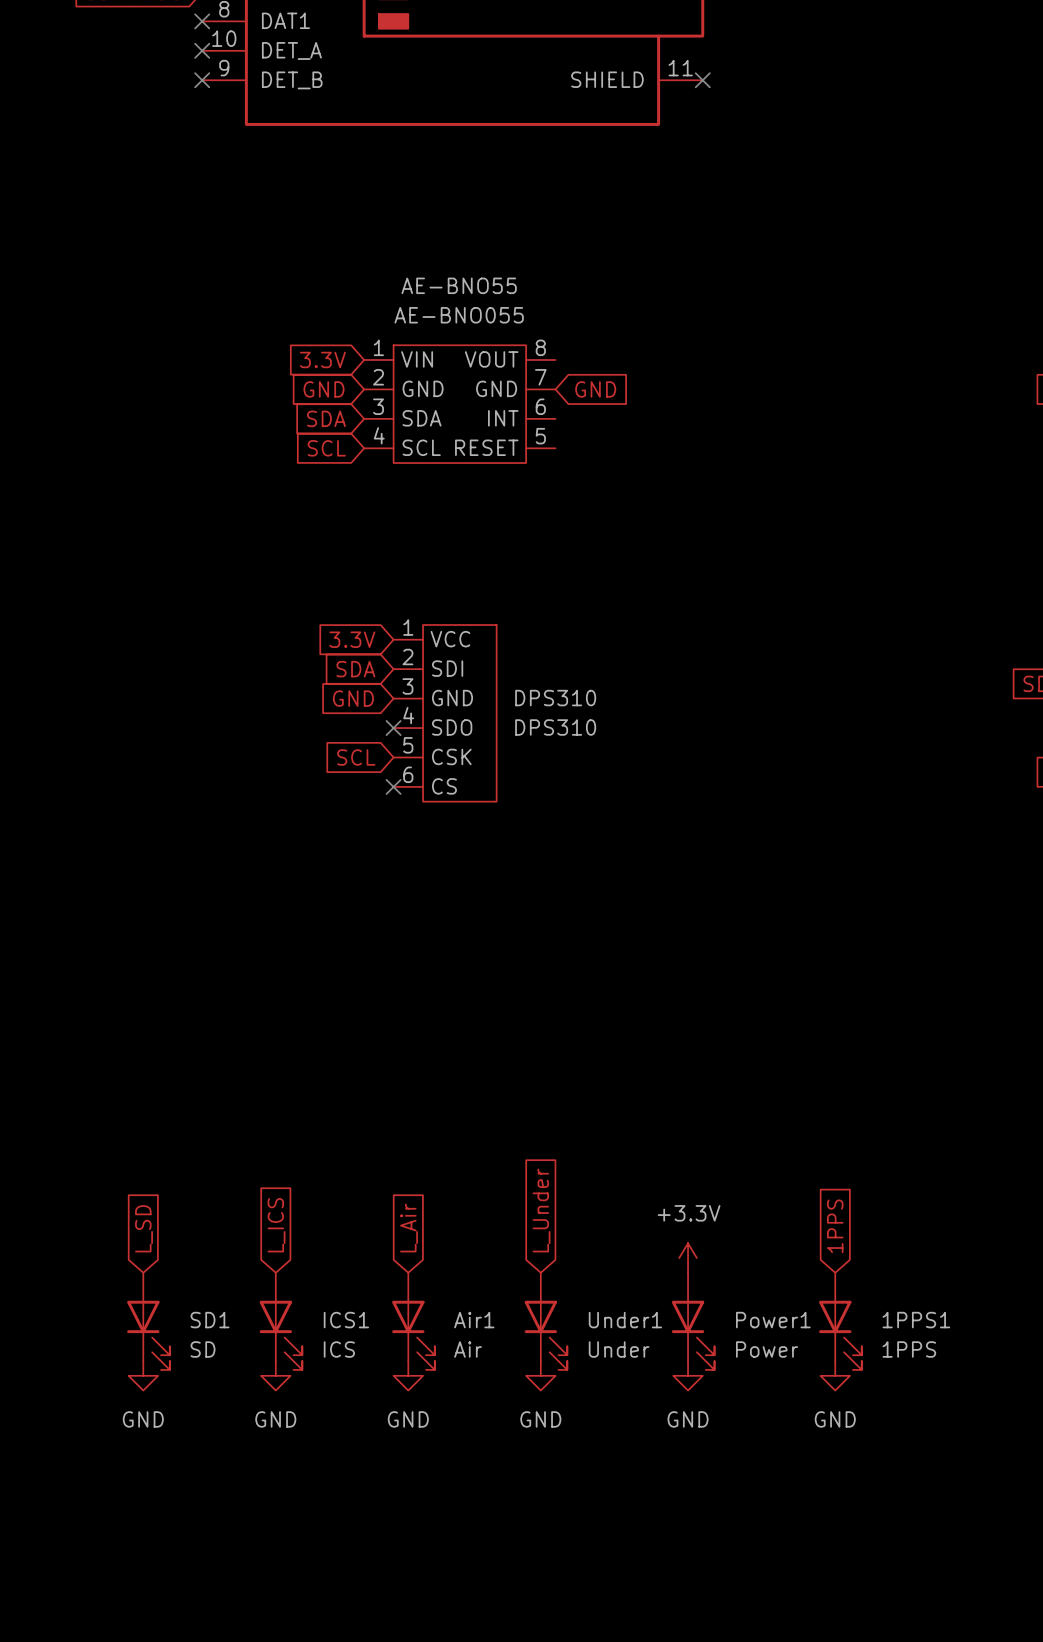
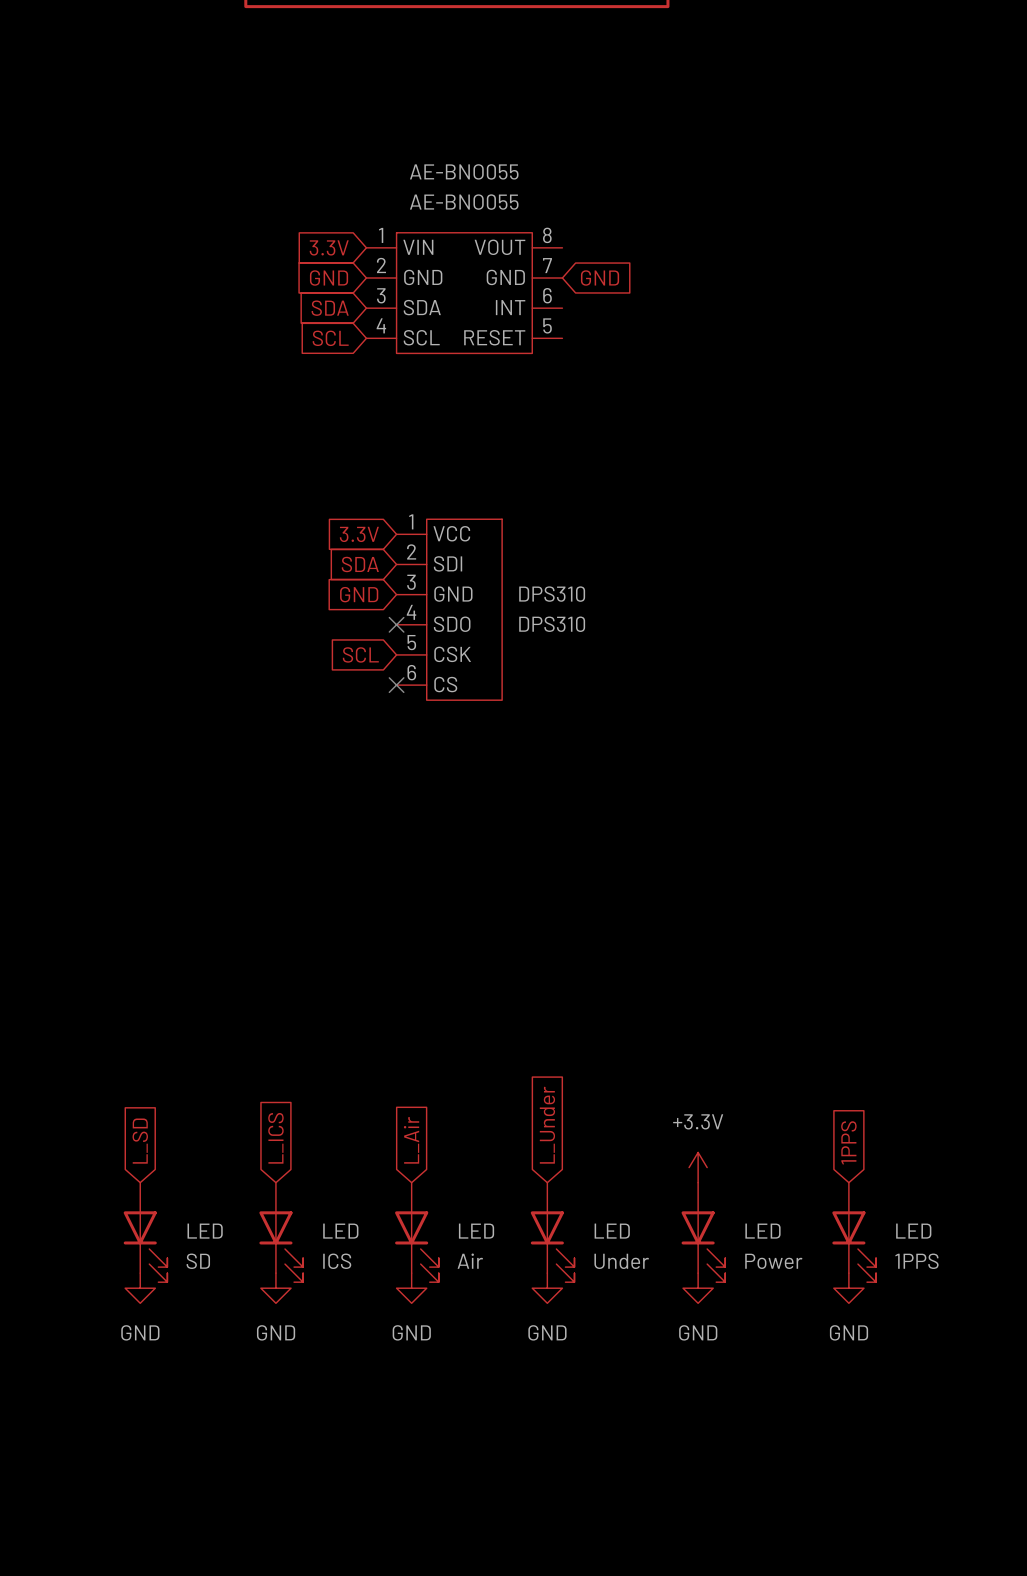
AE-BNO55 name: AE-BNO55 (459, 285) -> AE-BNO055 (464, 171)
SD1 name: SD1 (210, 1320) -> LED (205, 1231)
ICS1 name: ICS1 (346, 1320) -> LED (340, 1231)
Air1 name: Air1 (474, 1320) -> LED (476, 1231)
Under1 name: Under1 (625, 1320) -> LED (612, 1231)
Power1 name: Power1 (773, 1320) -> LED (762, 1231)
1PPS1 name: 1PPS1 (916, 1320) -> LED (913, 1231)

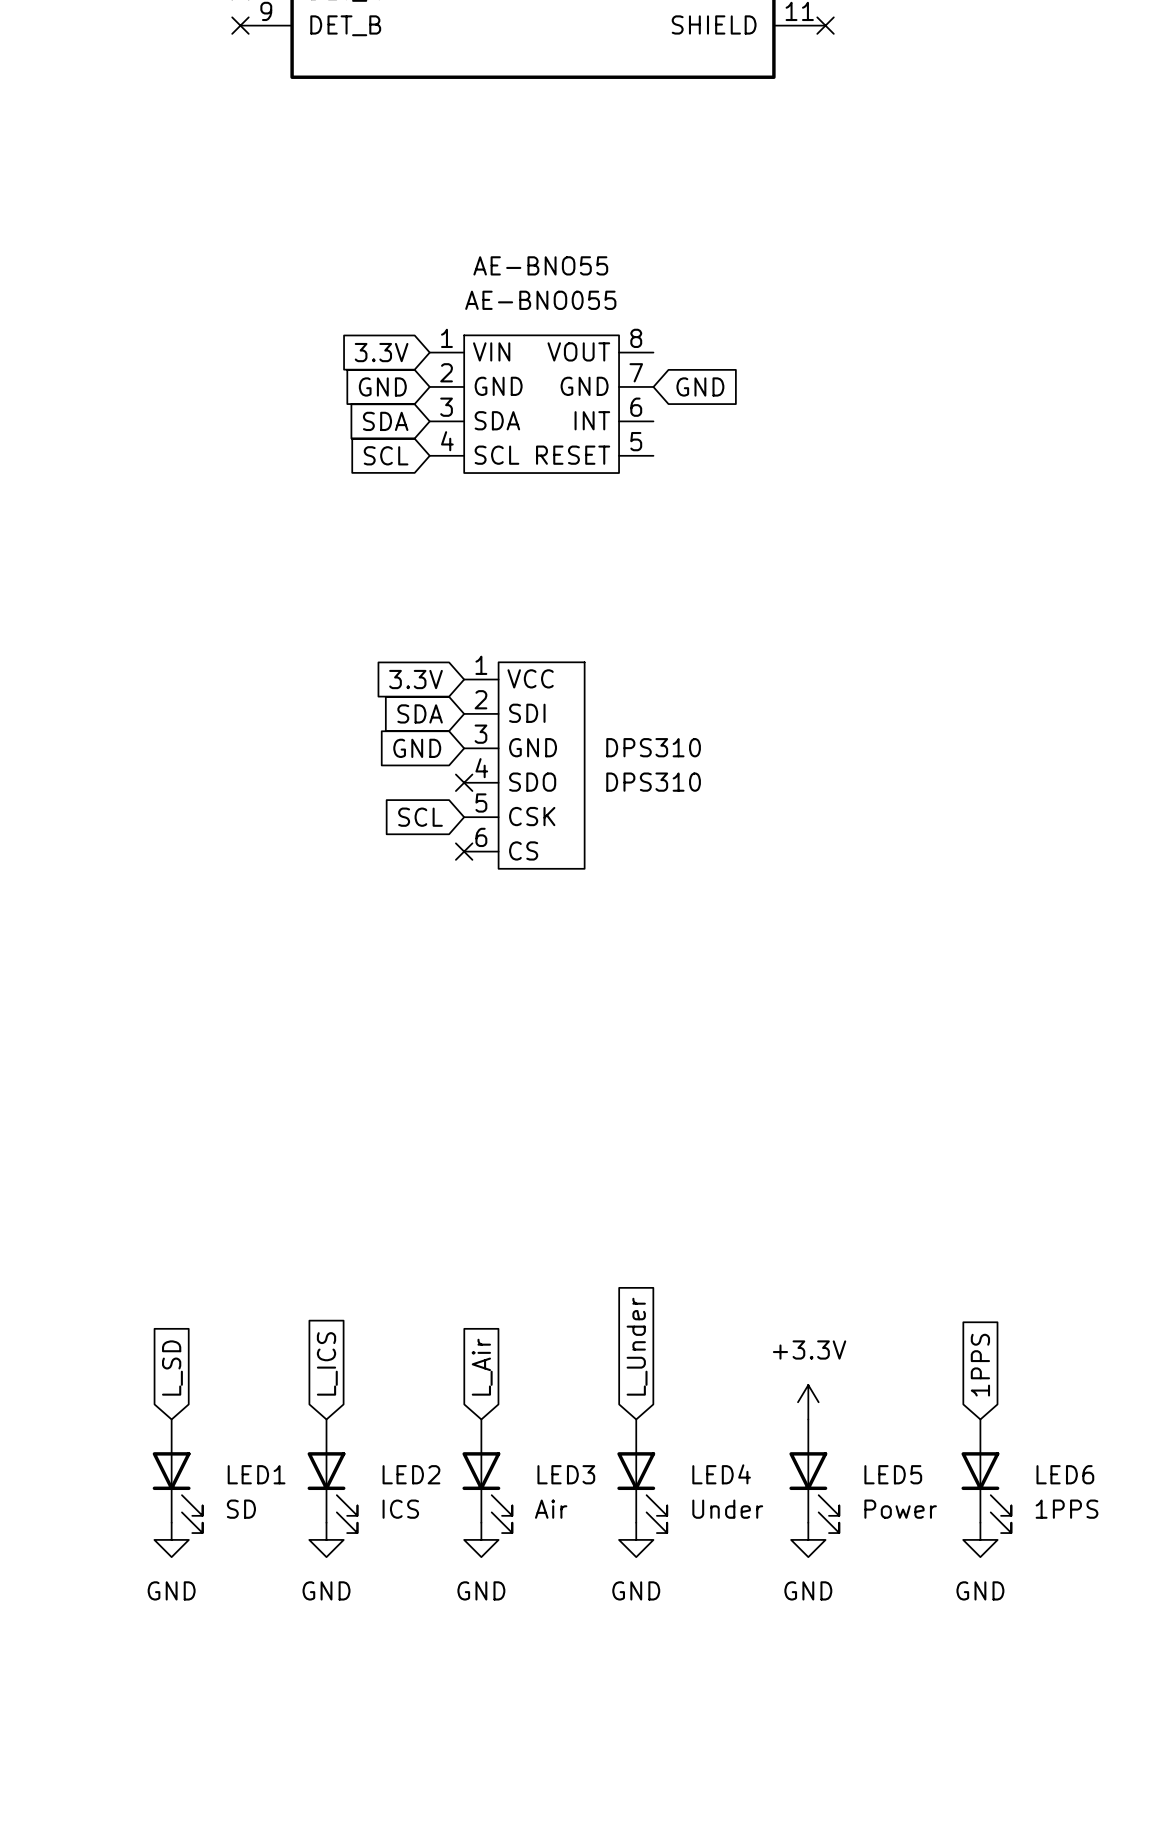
AE-BNO055 name: AE-BNO055 (464, 171) -> AE-BNO55 (540, 265)
LED name: LED (205, 1231) -> LED1 (256, 1474)
LED name: LED (340, 1231) -> LED2 (411, 1474)
LED name: LED (476, 1231) -> LED3 (566, 1474)
LED name: LED (612, 1231) -> LED4 (721, 1474)
LED name: LED (762, 1231) -> LED5 (893, 1474)
LED name: LED (913, 1231) -> LED6 (1065, 1474)

